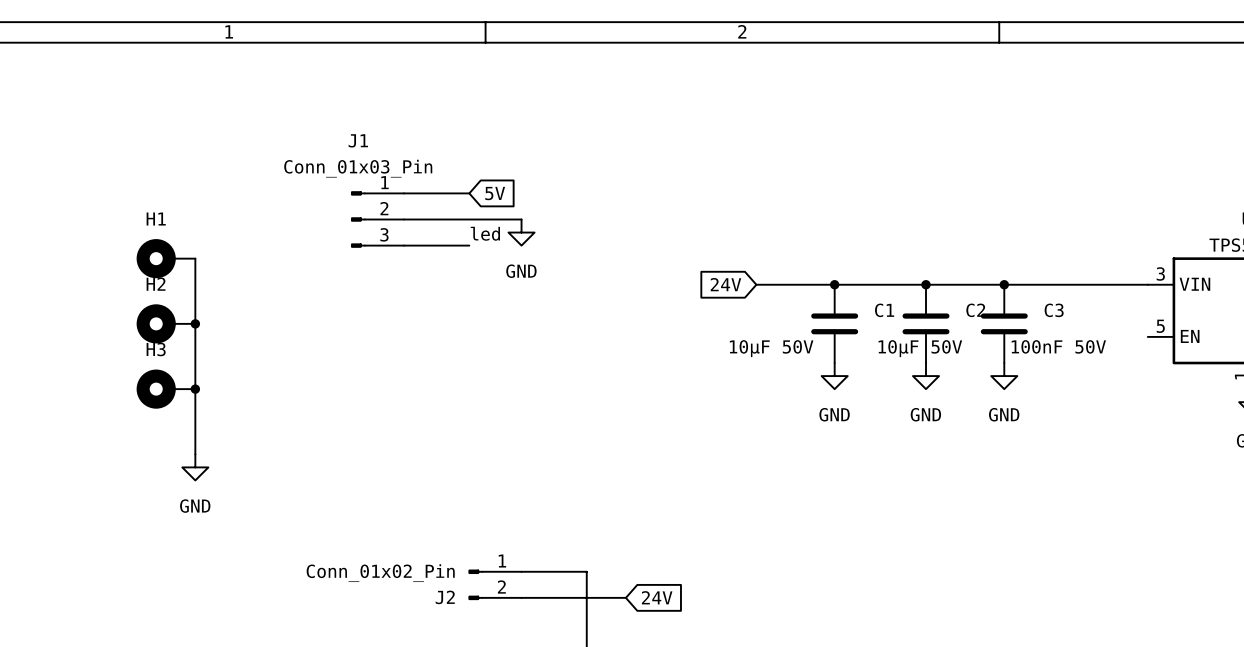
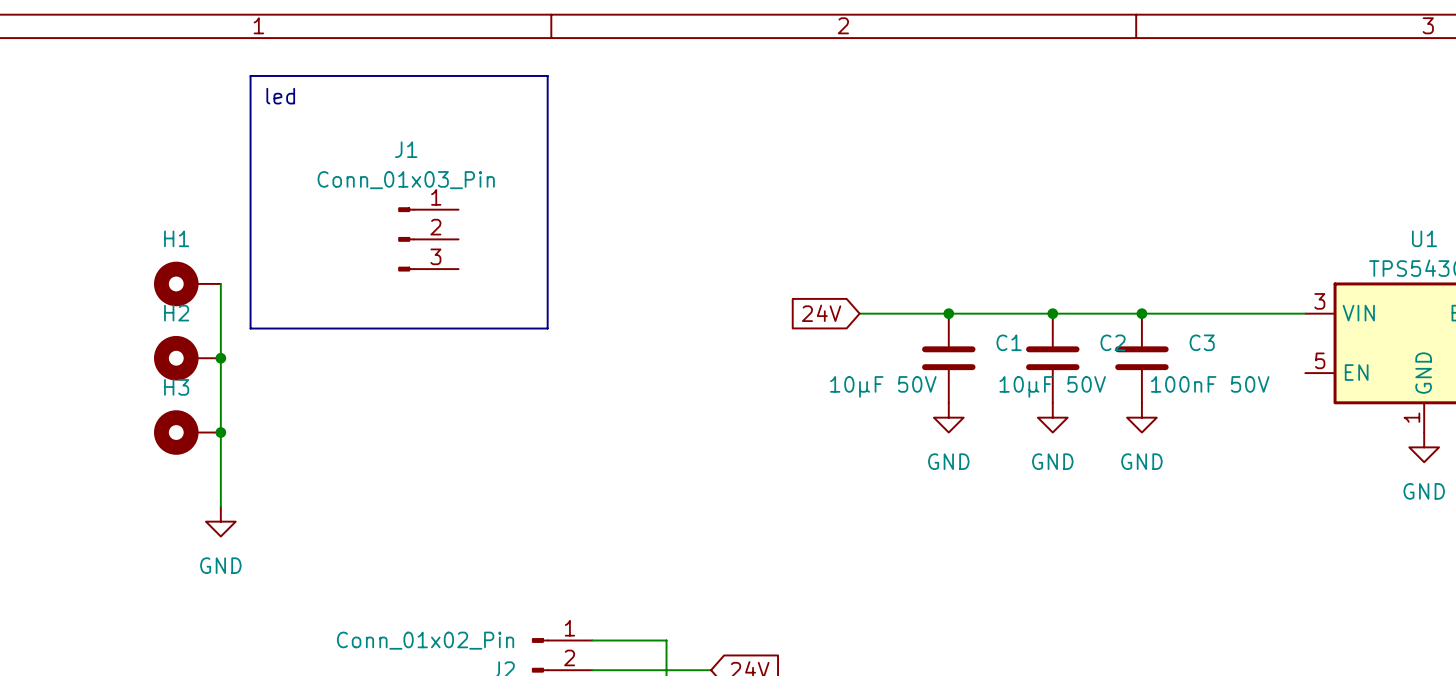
line: none -> (250, 75) (547, 75) (547, 328) (250, 328) (250, 75)
text: none -> led (280, 96)
wire: (404, 193) (469, 193) -> none
global label: 5V (495, 193) -> none
wire: (404, 219) (521, 219) -> none
power symbol: GND (521, 232) -> none
label: led (485, 233) -> none
wire: (404, 245) (469, 245) -> none

